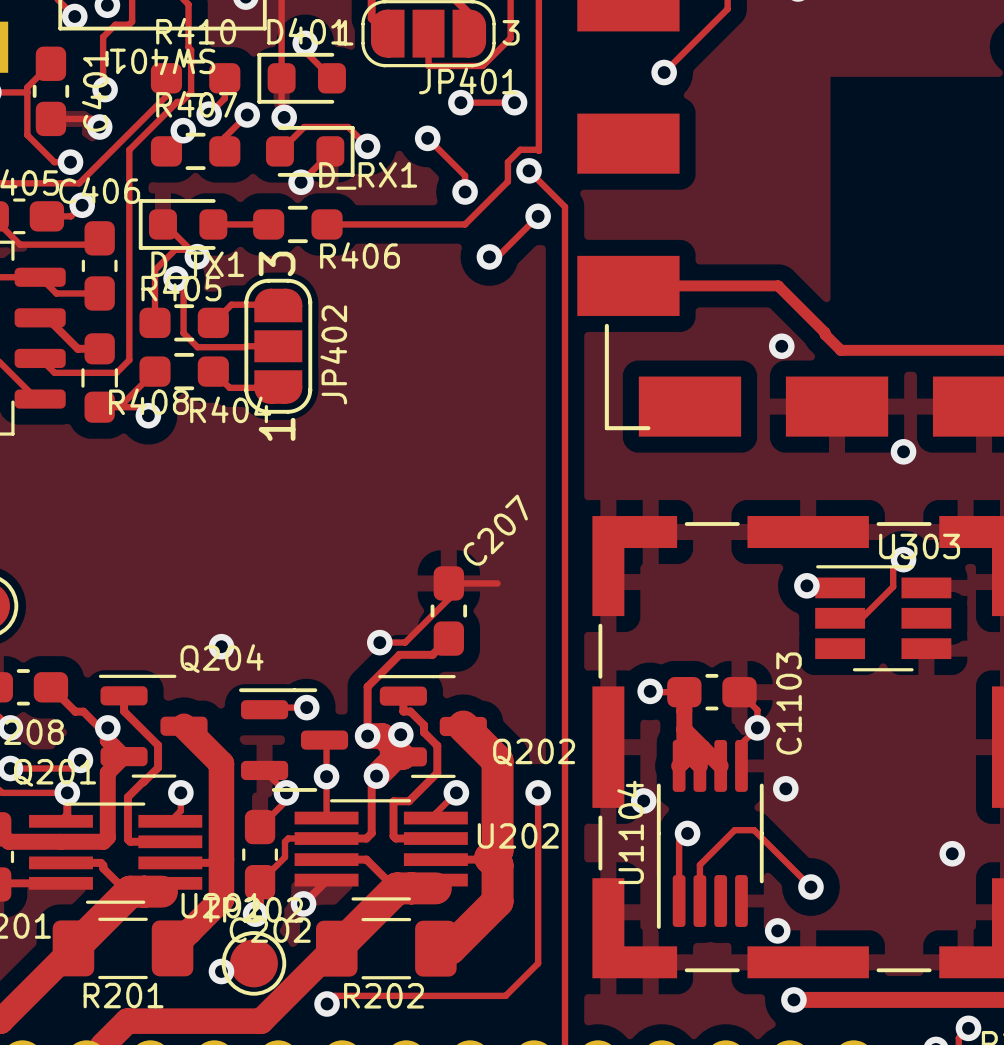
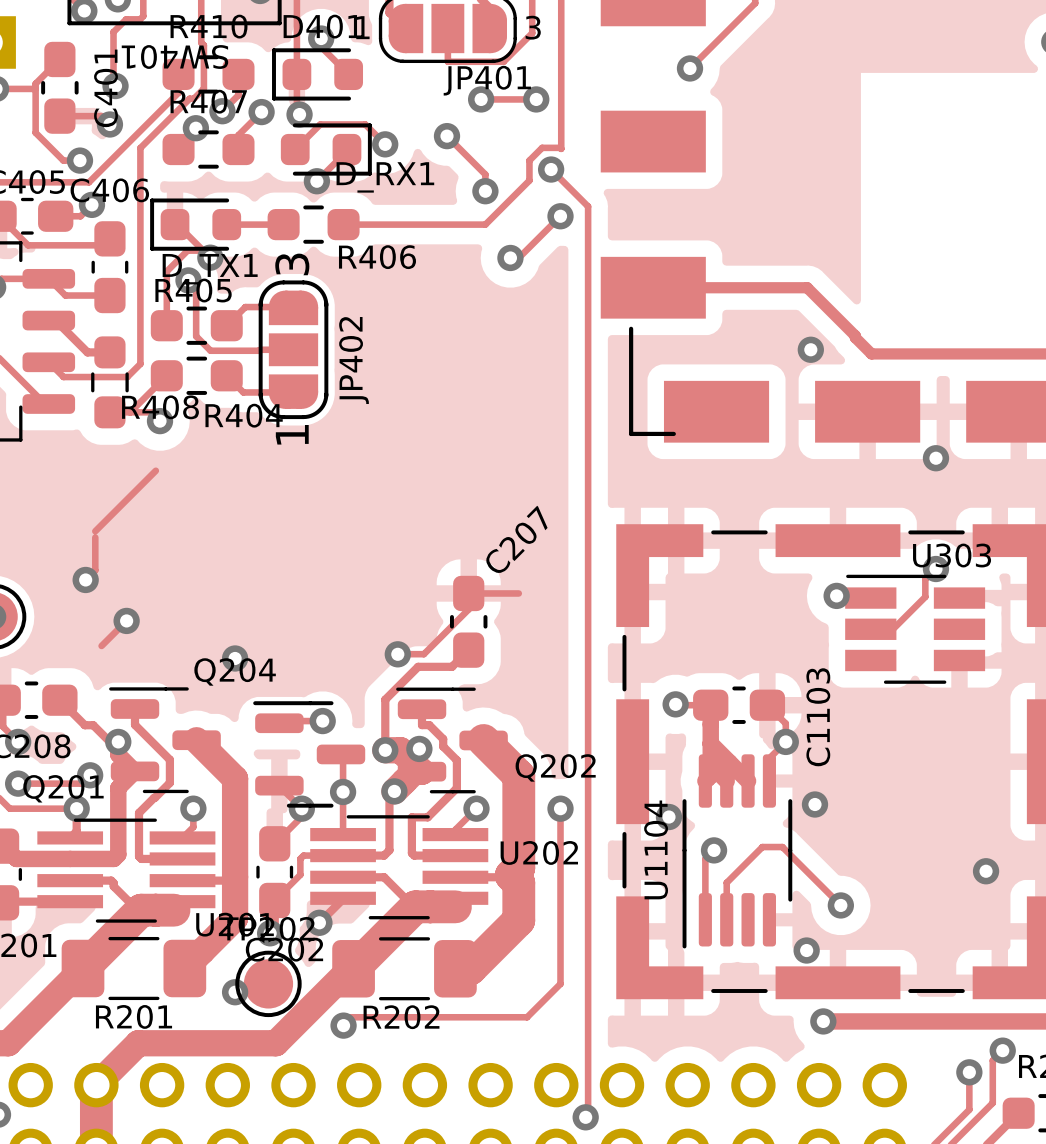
track: none -> (155, 470) (95, 531)
track: none -> (95, 537) (95, 570) (85, 579)
via: none -> (85, 579)
track: none -> (126, 620) (101, 645)
via: none -> (126, 620)

